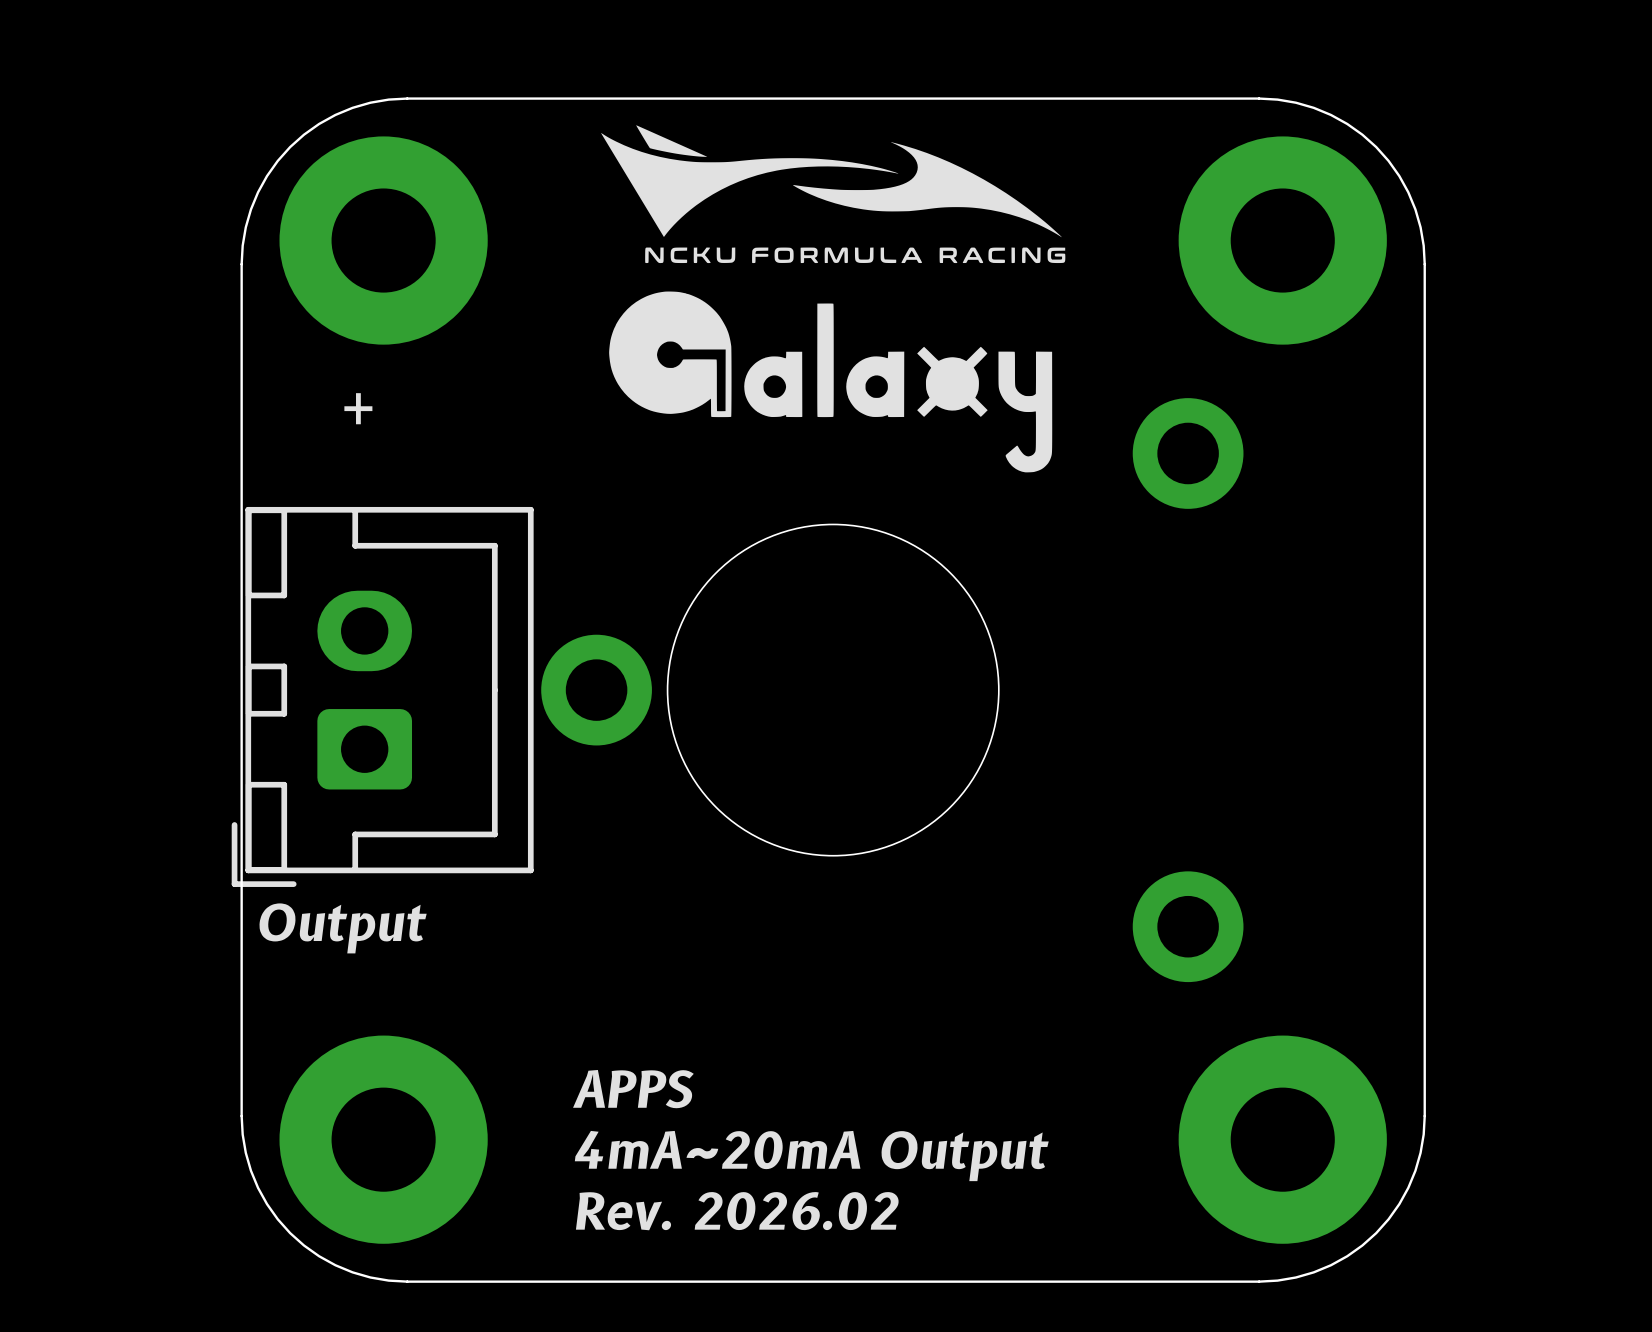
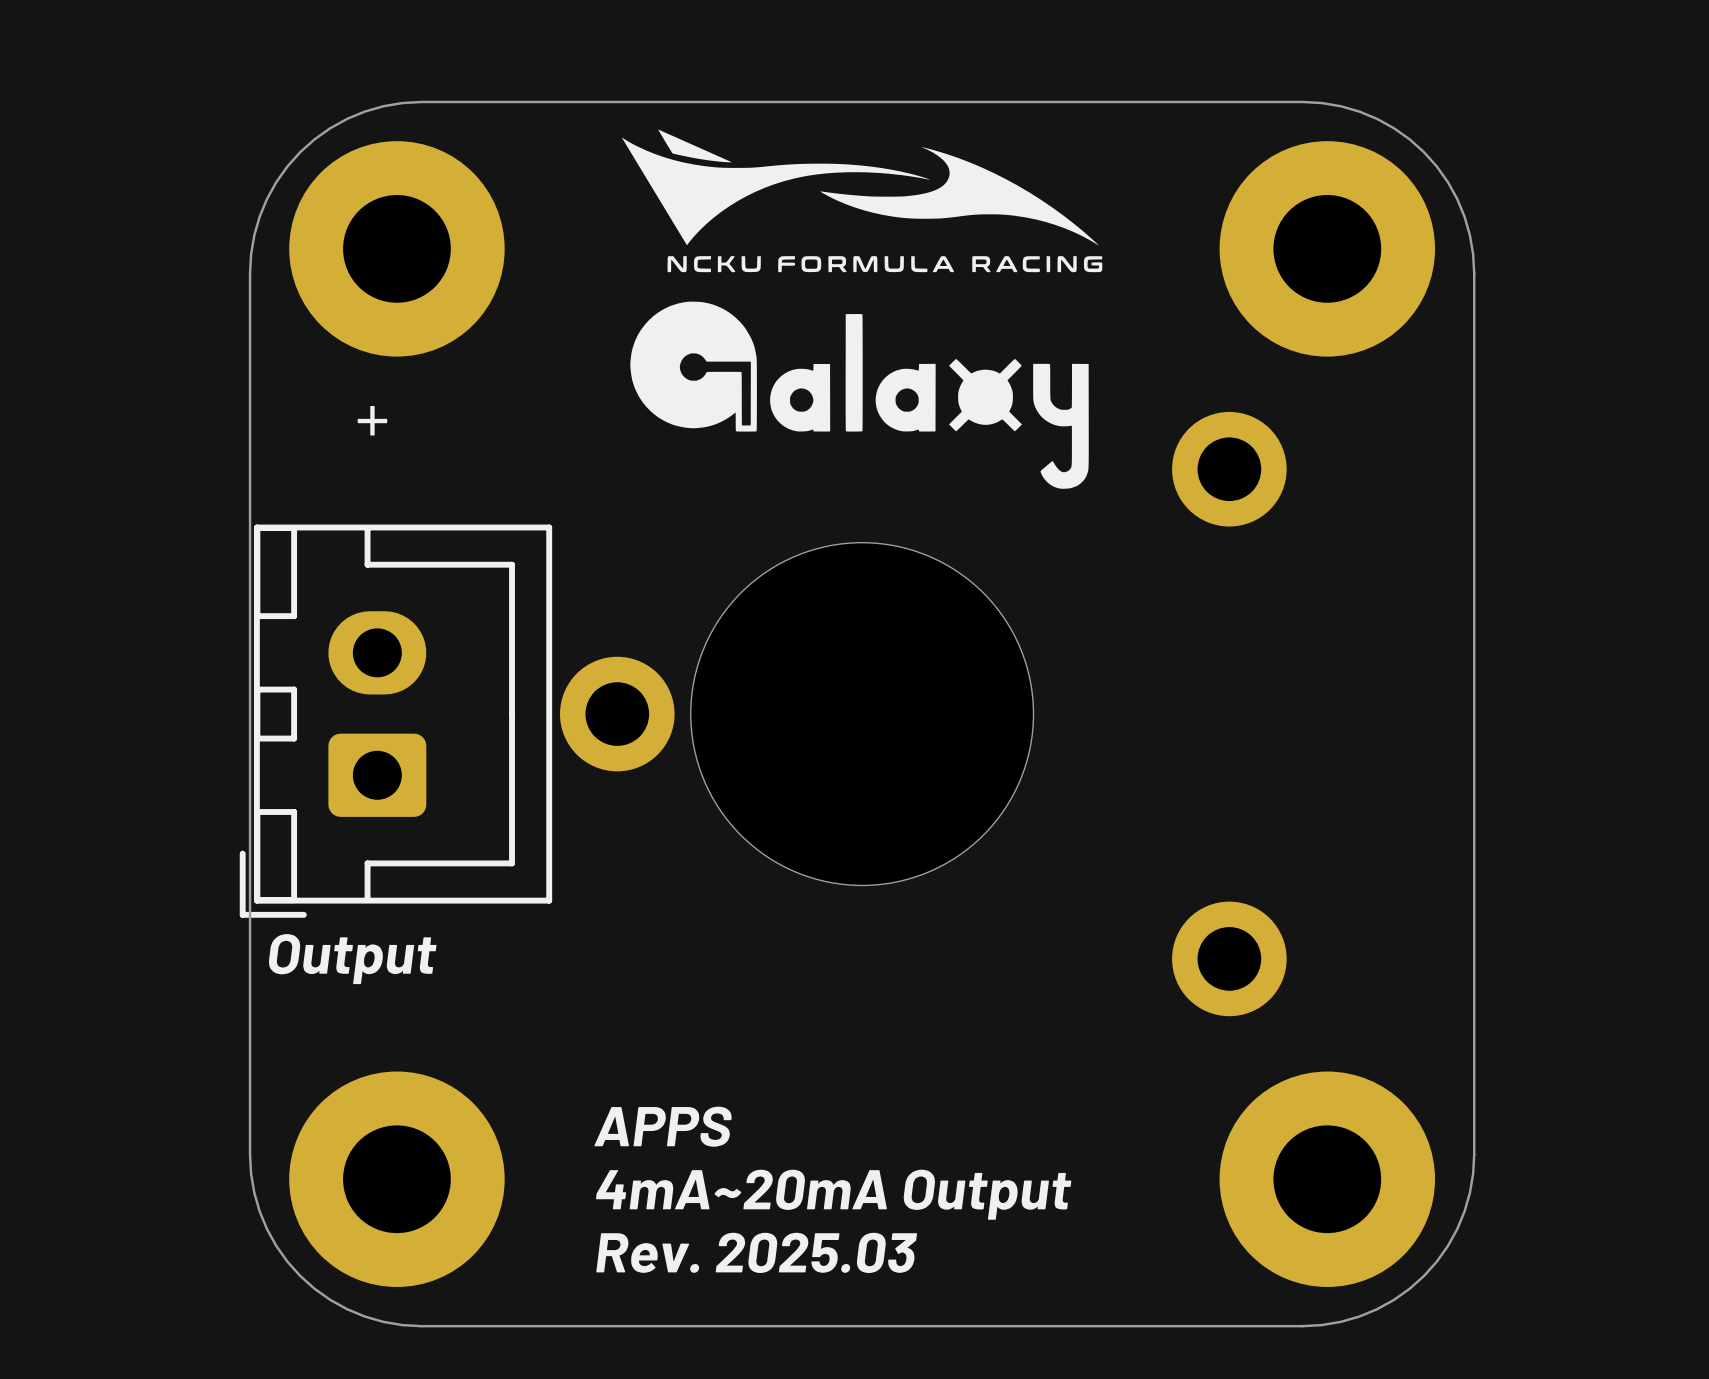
text: Rev. 2026.02 (737, 1211) -> Rev. 2025.03 (756, 1252)

